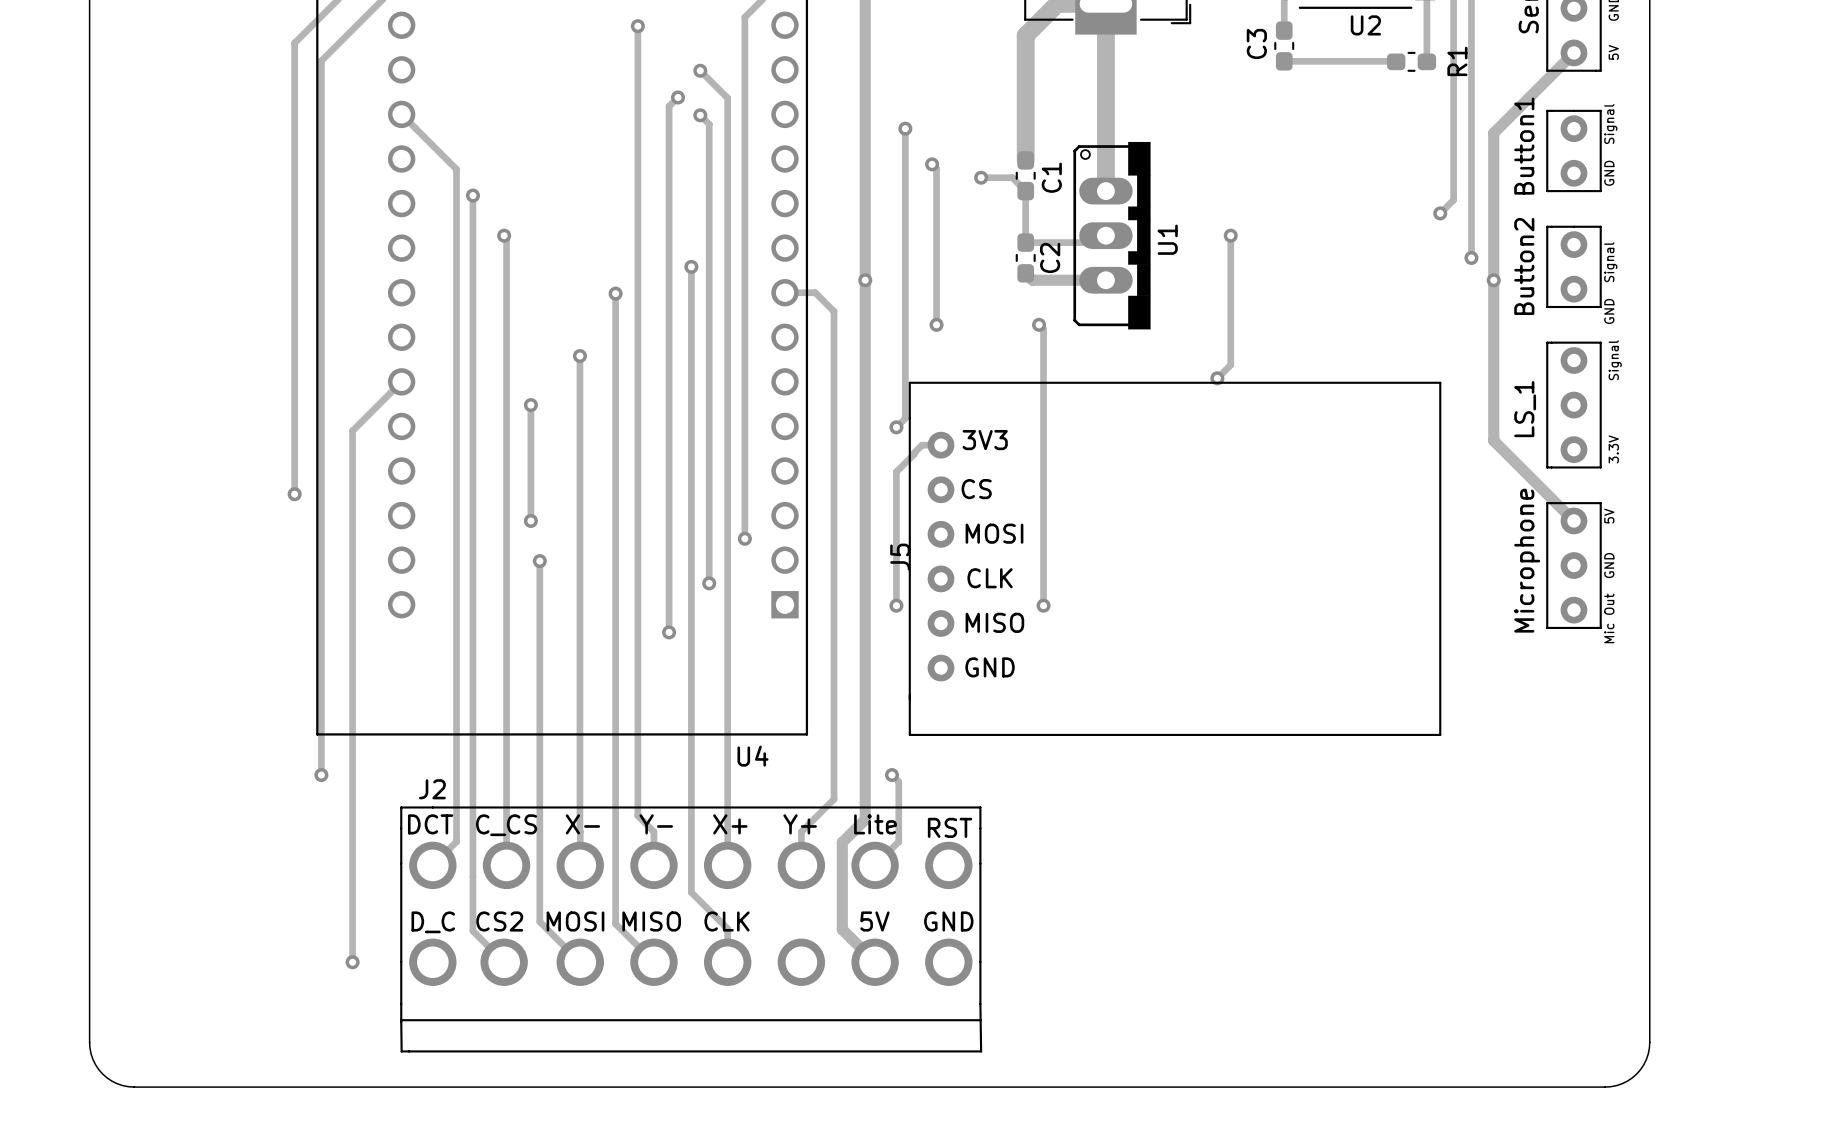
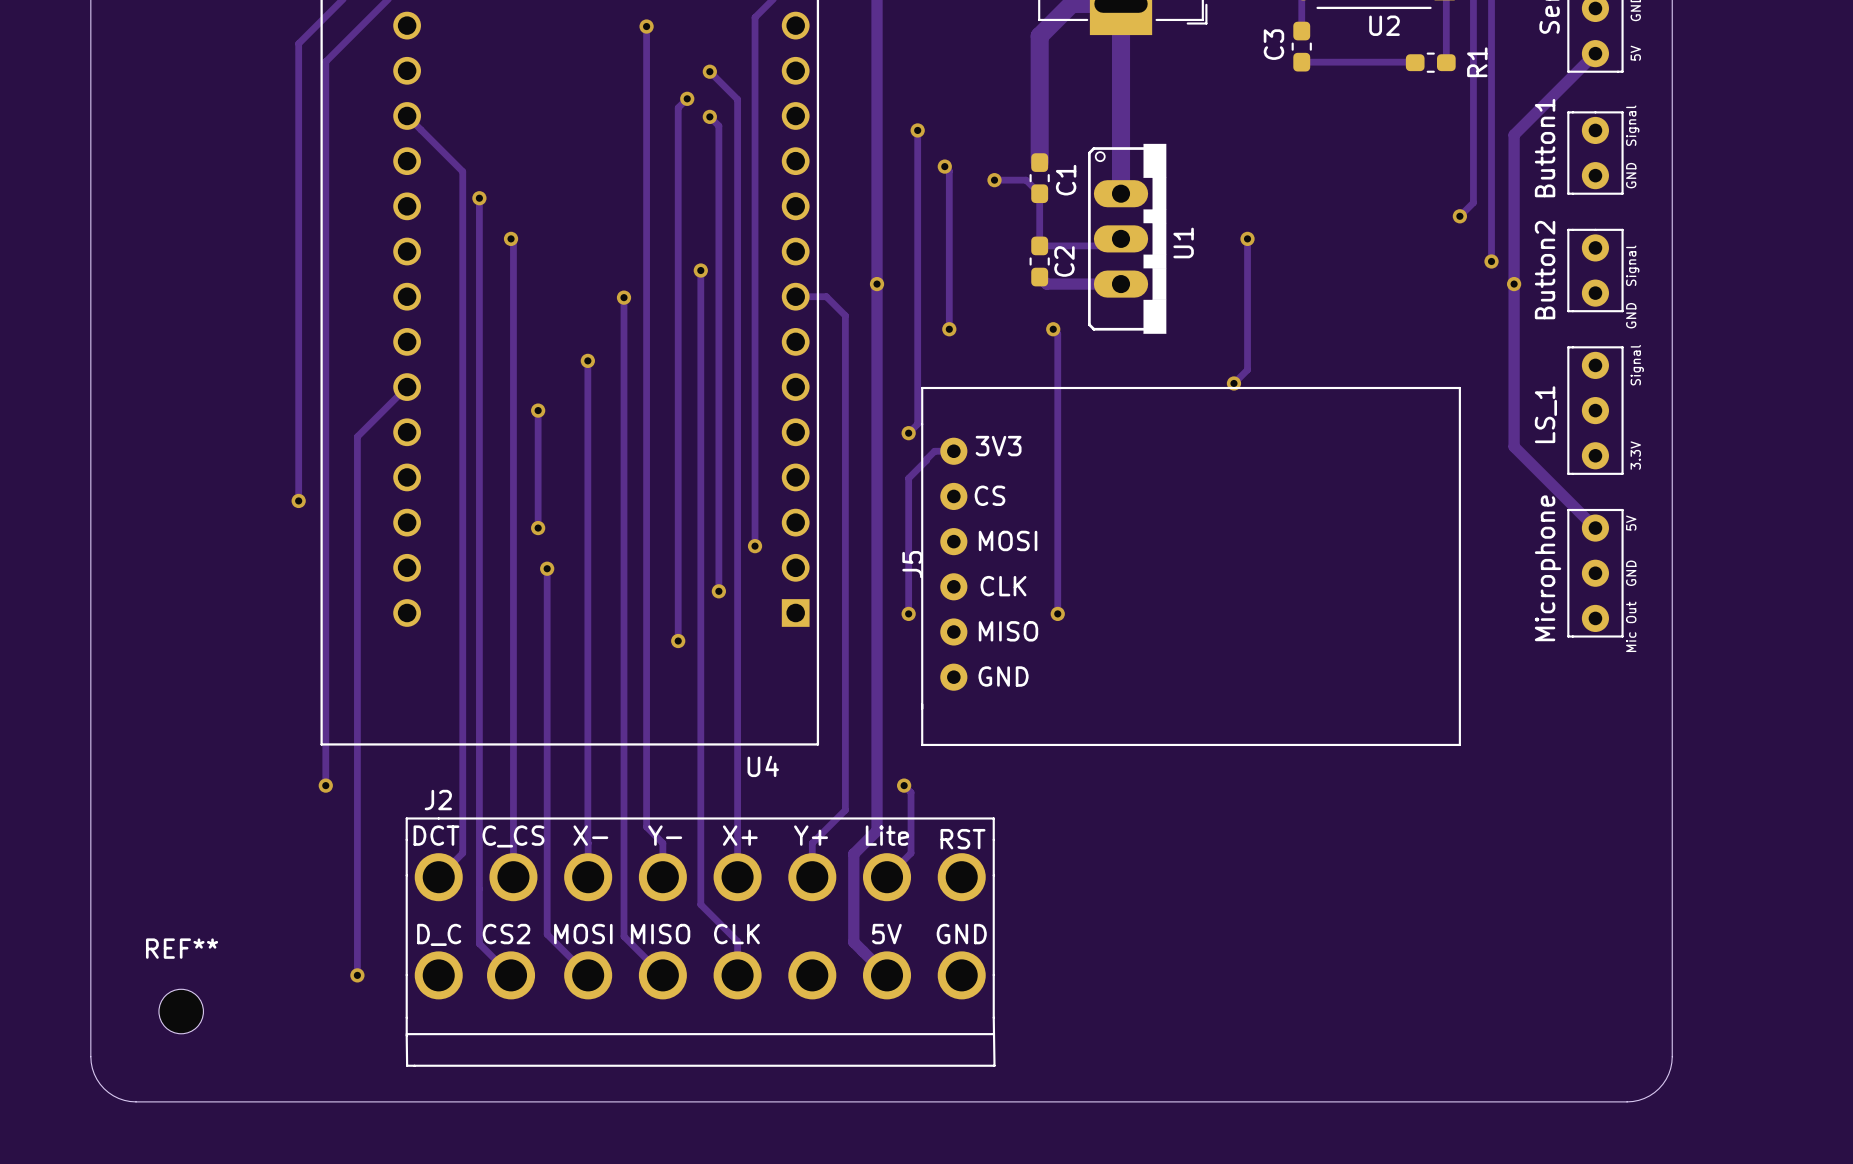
REF**: none -> (181, 1011)

